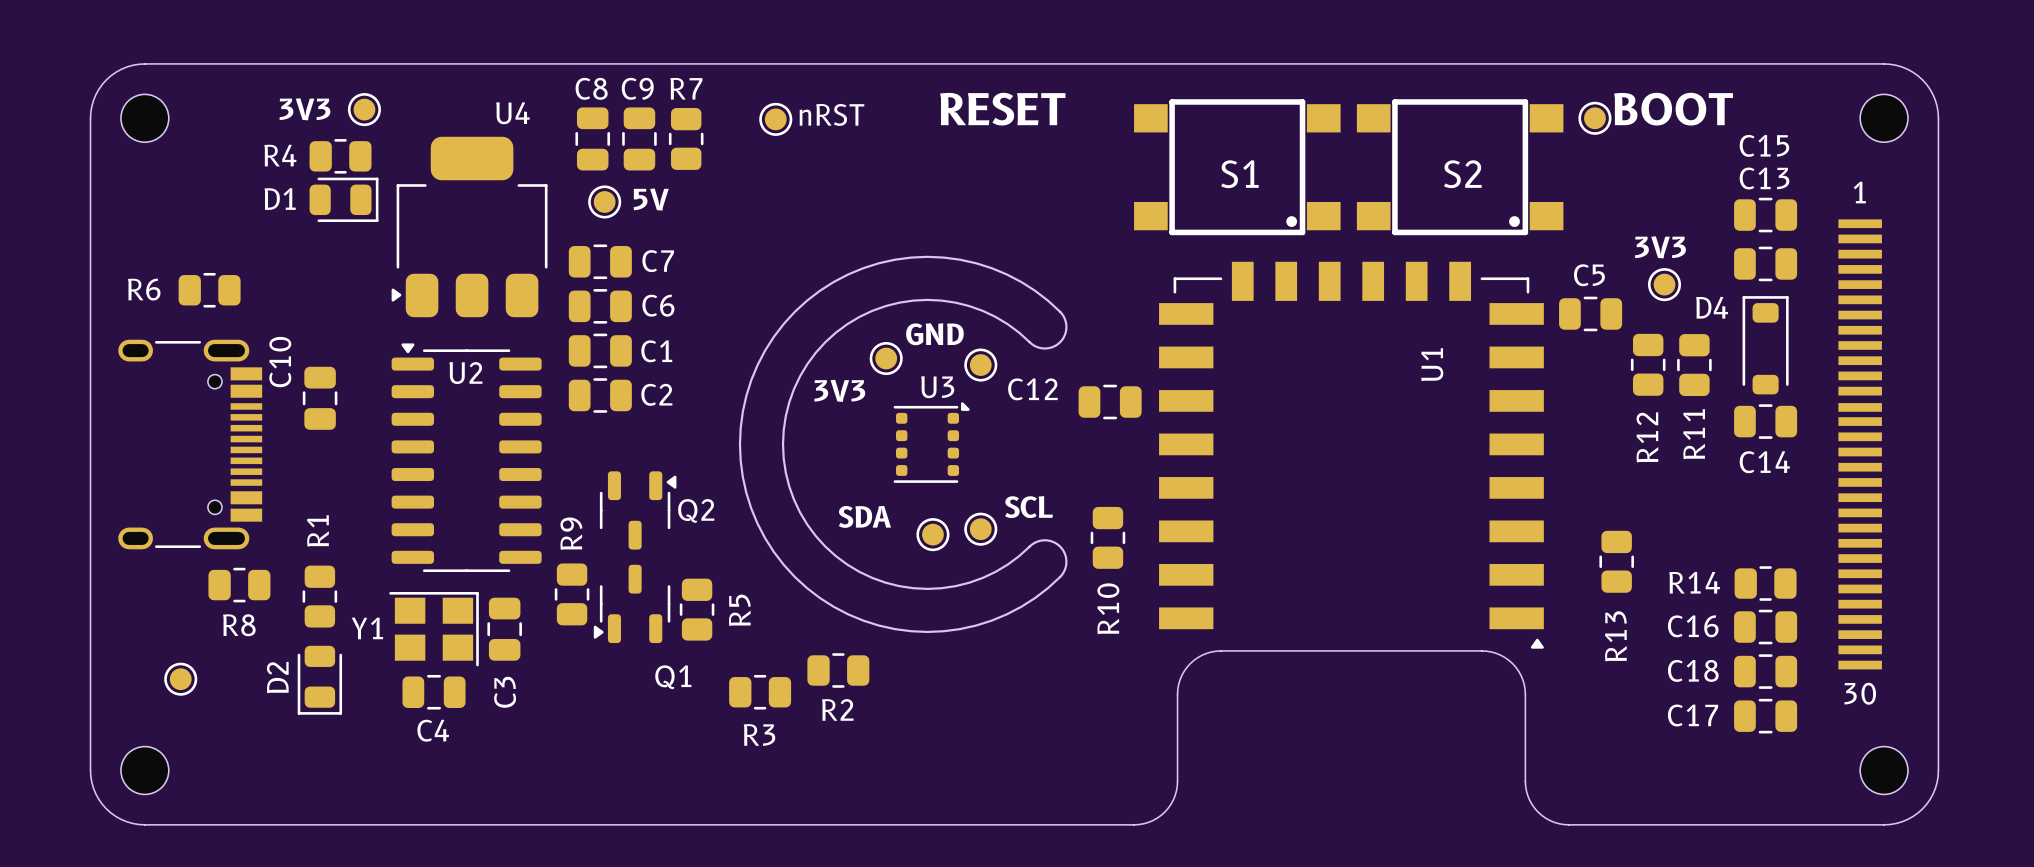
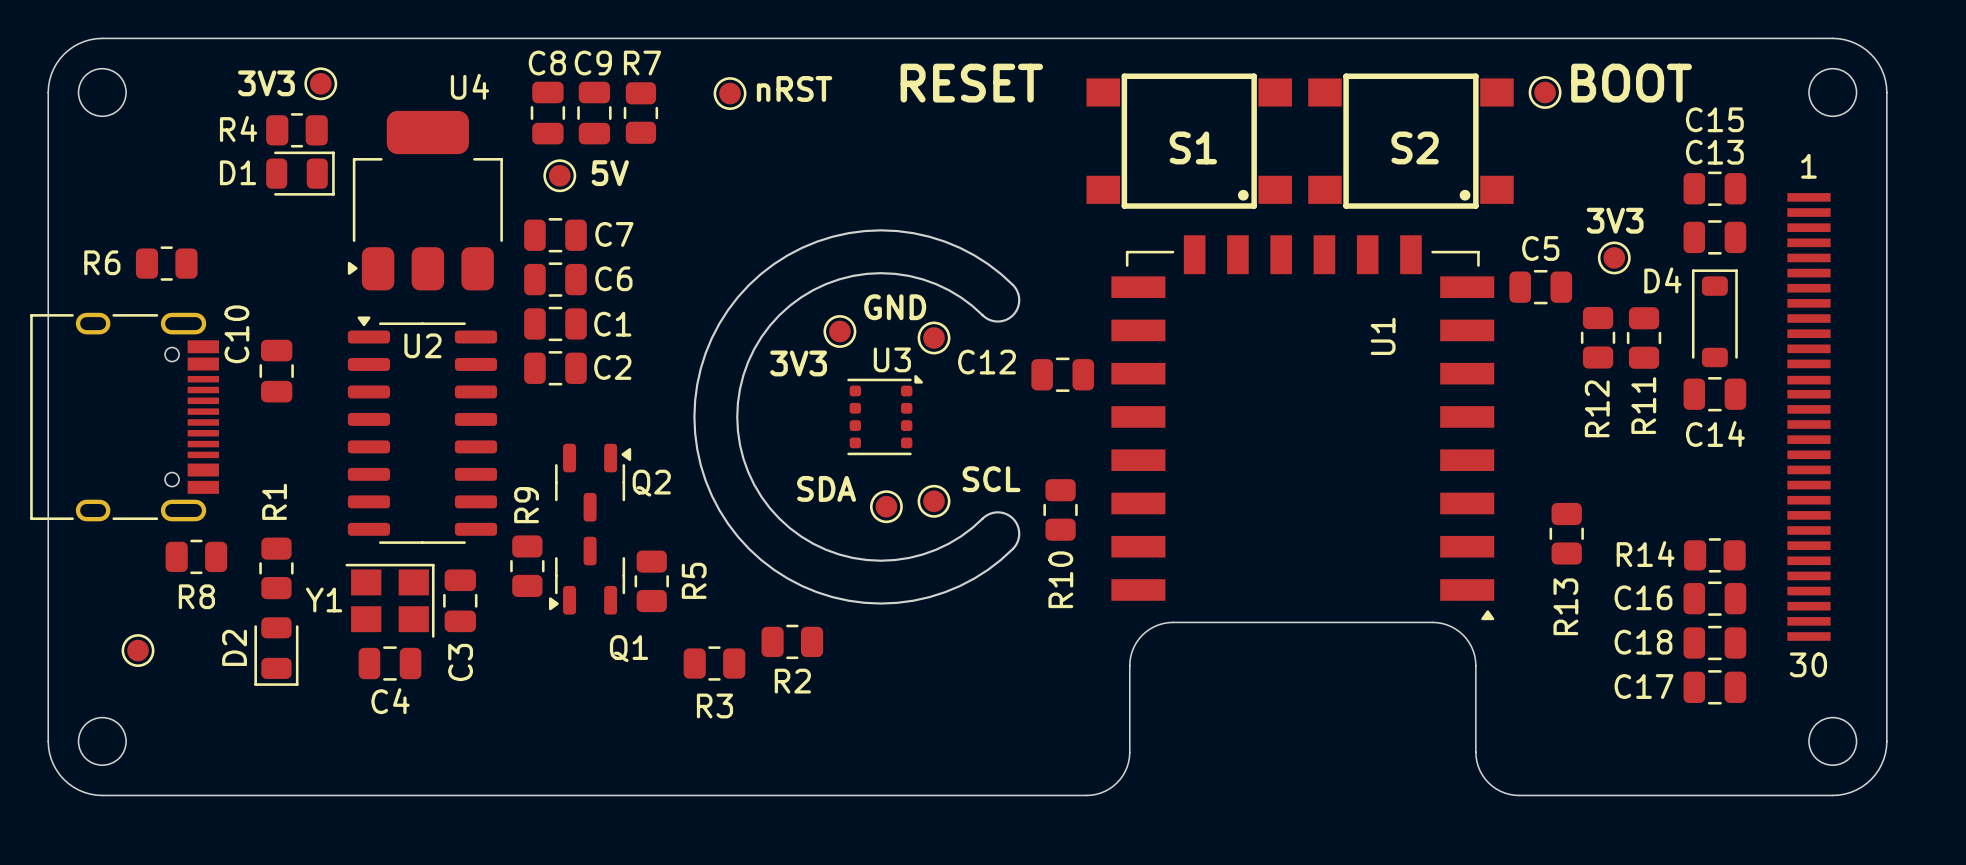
part: none -> (124, 417)

